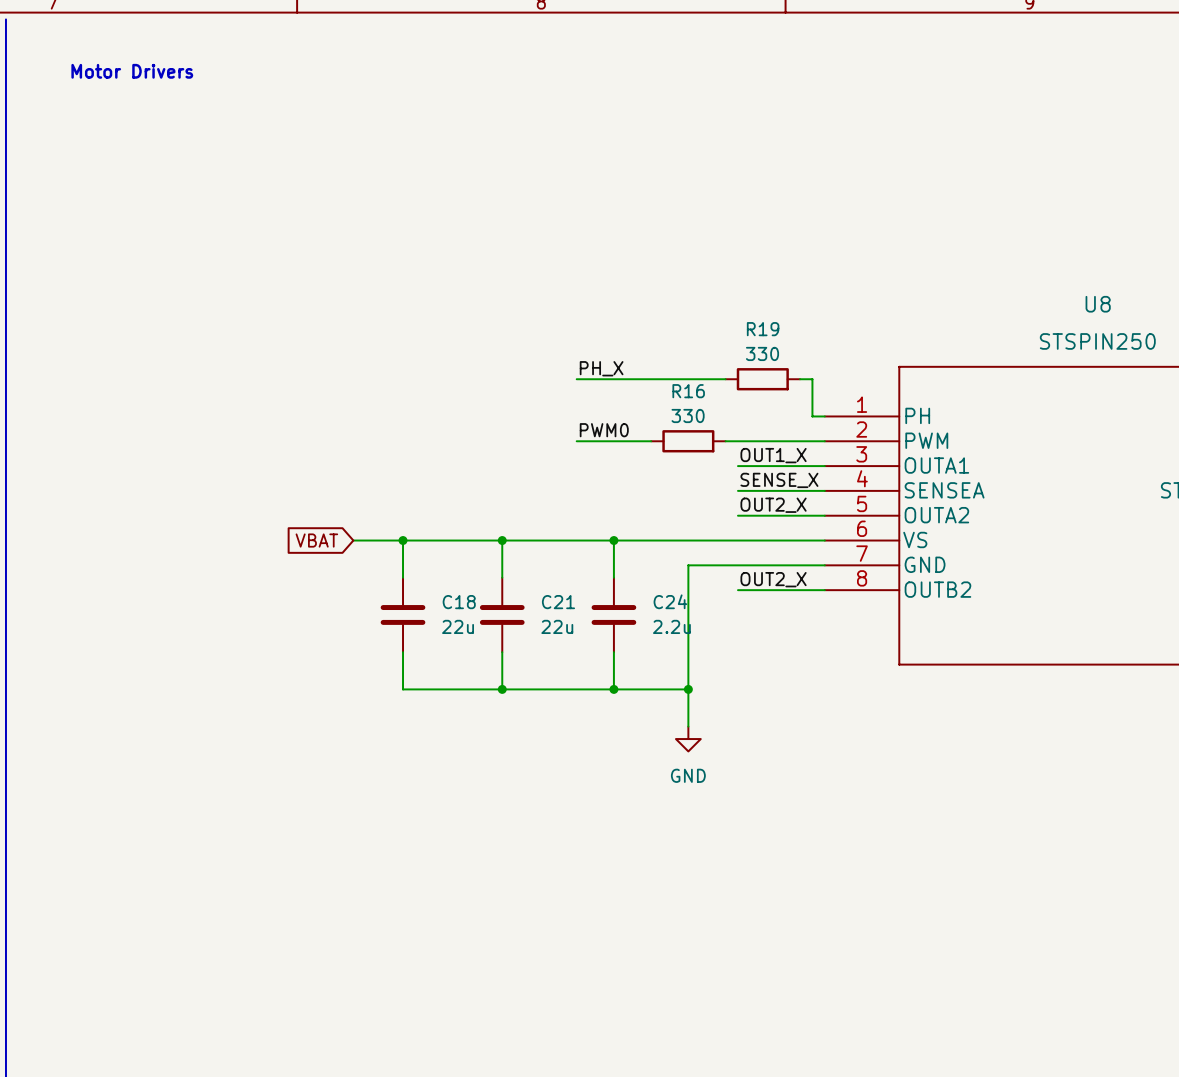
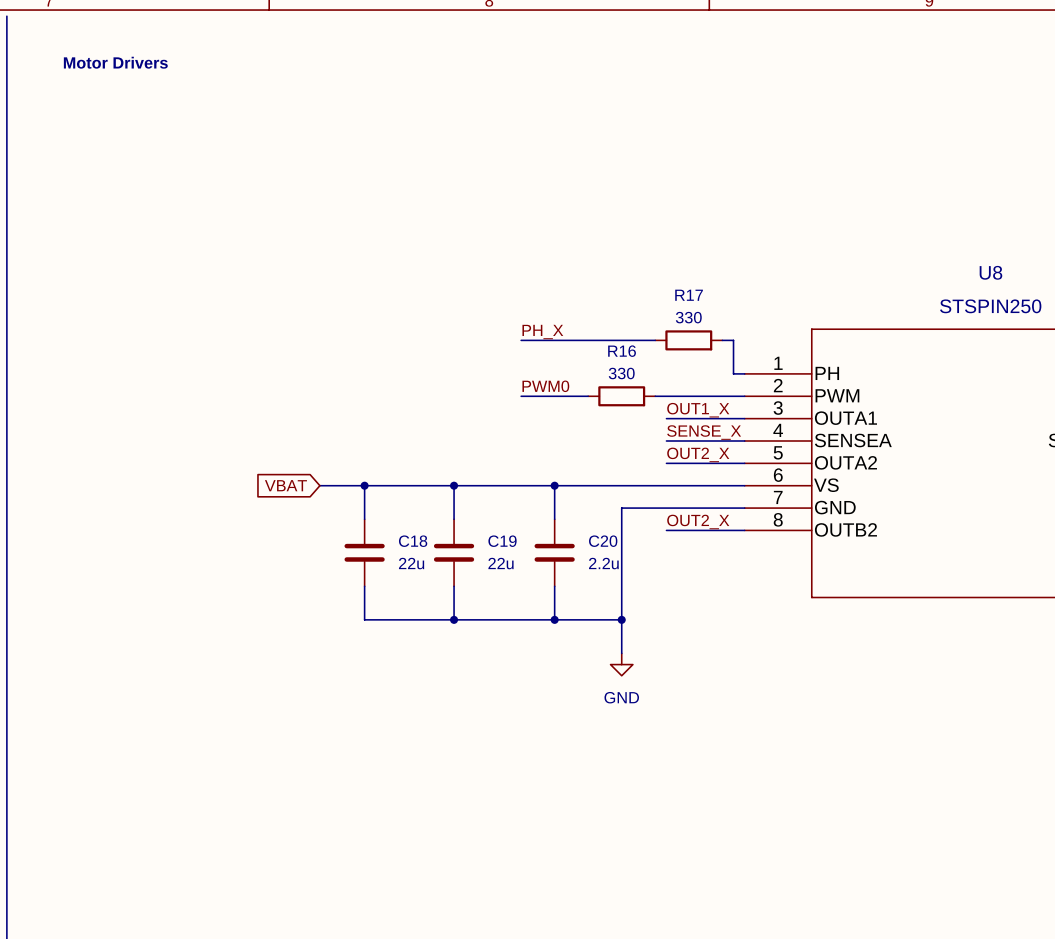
R19 name: R19 (763, 329) -> R17 (689, 295)
C24 name: C24 (670, 601) -> C20 (603, 541)
C21 name: C21 (558, 602) -> C19 (502, 541)

